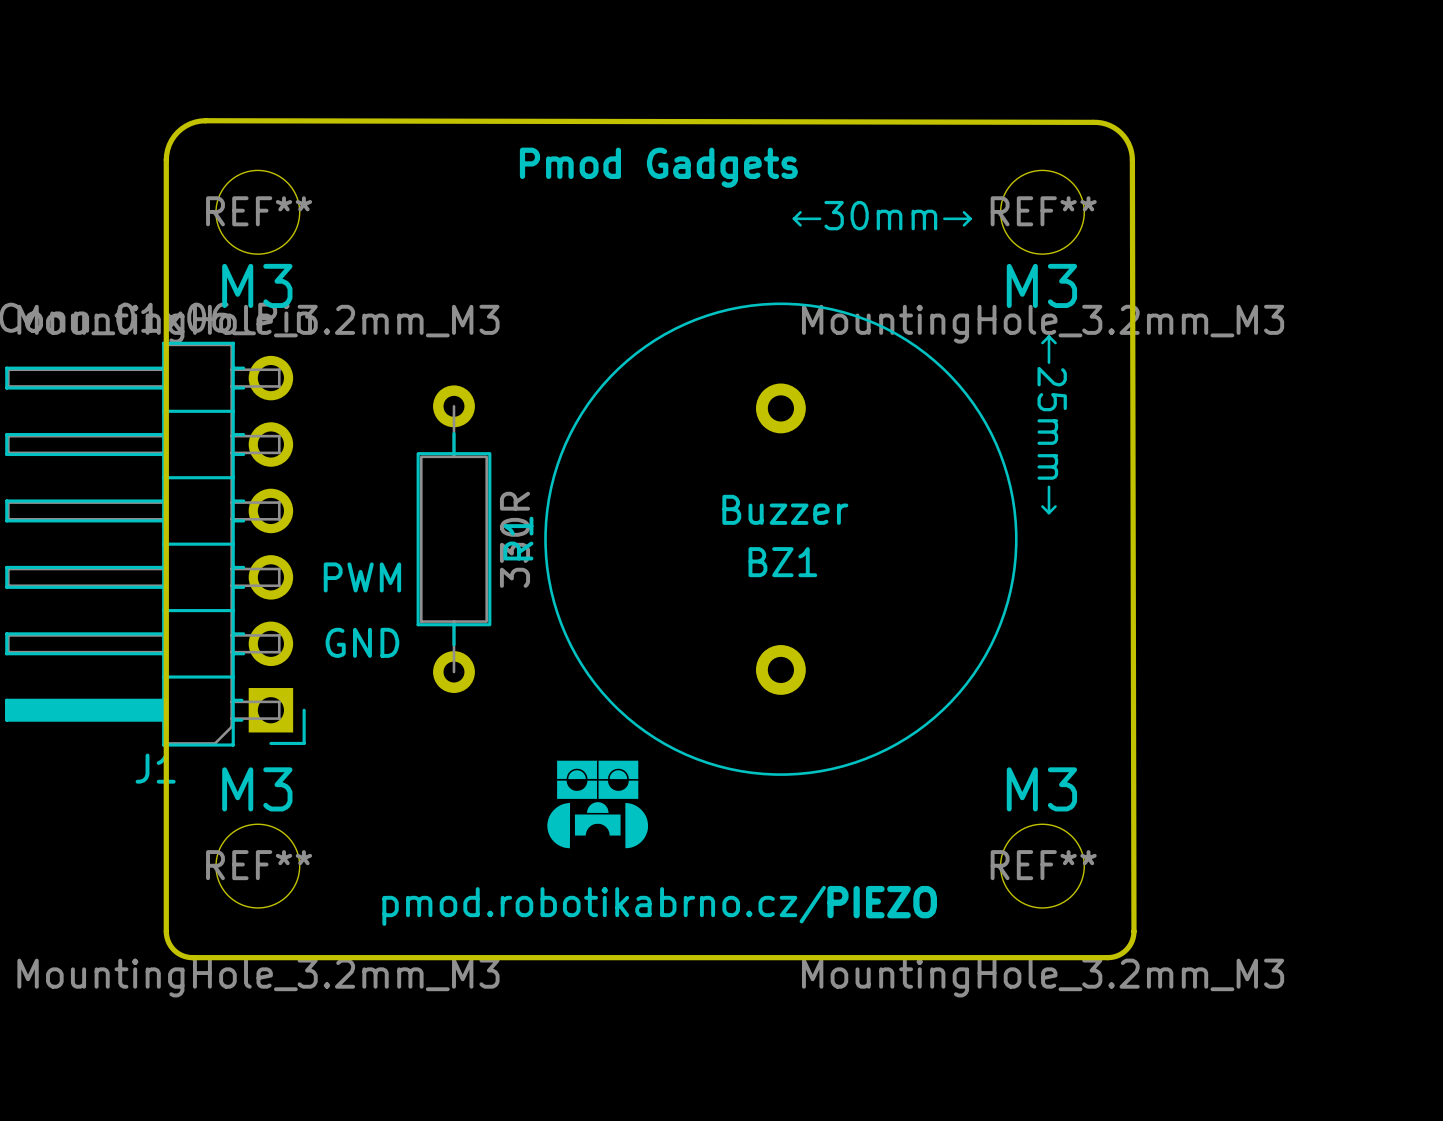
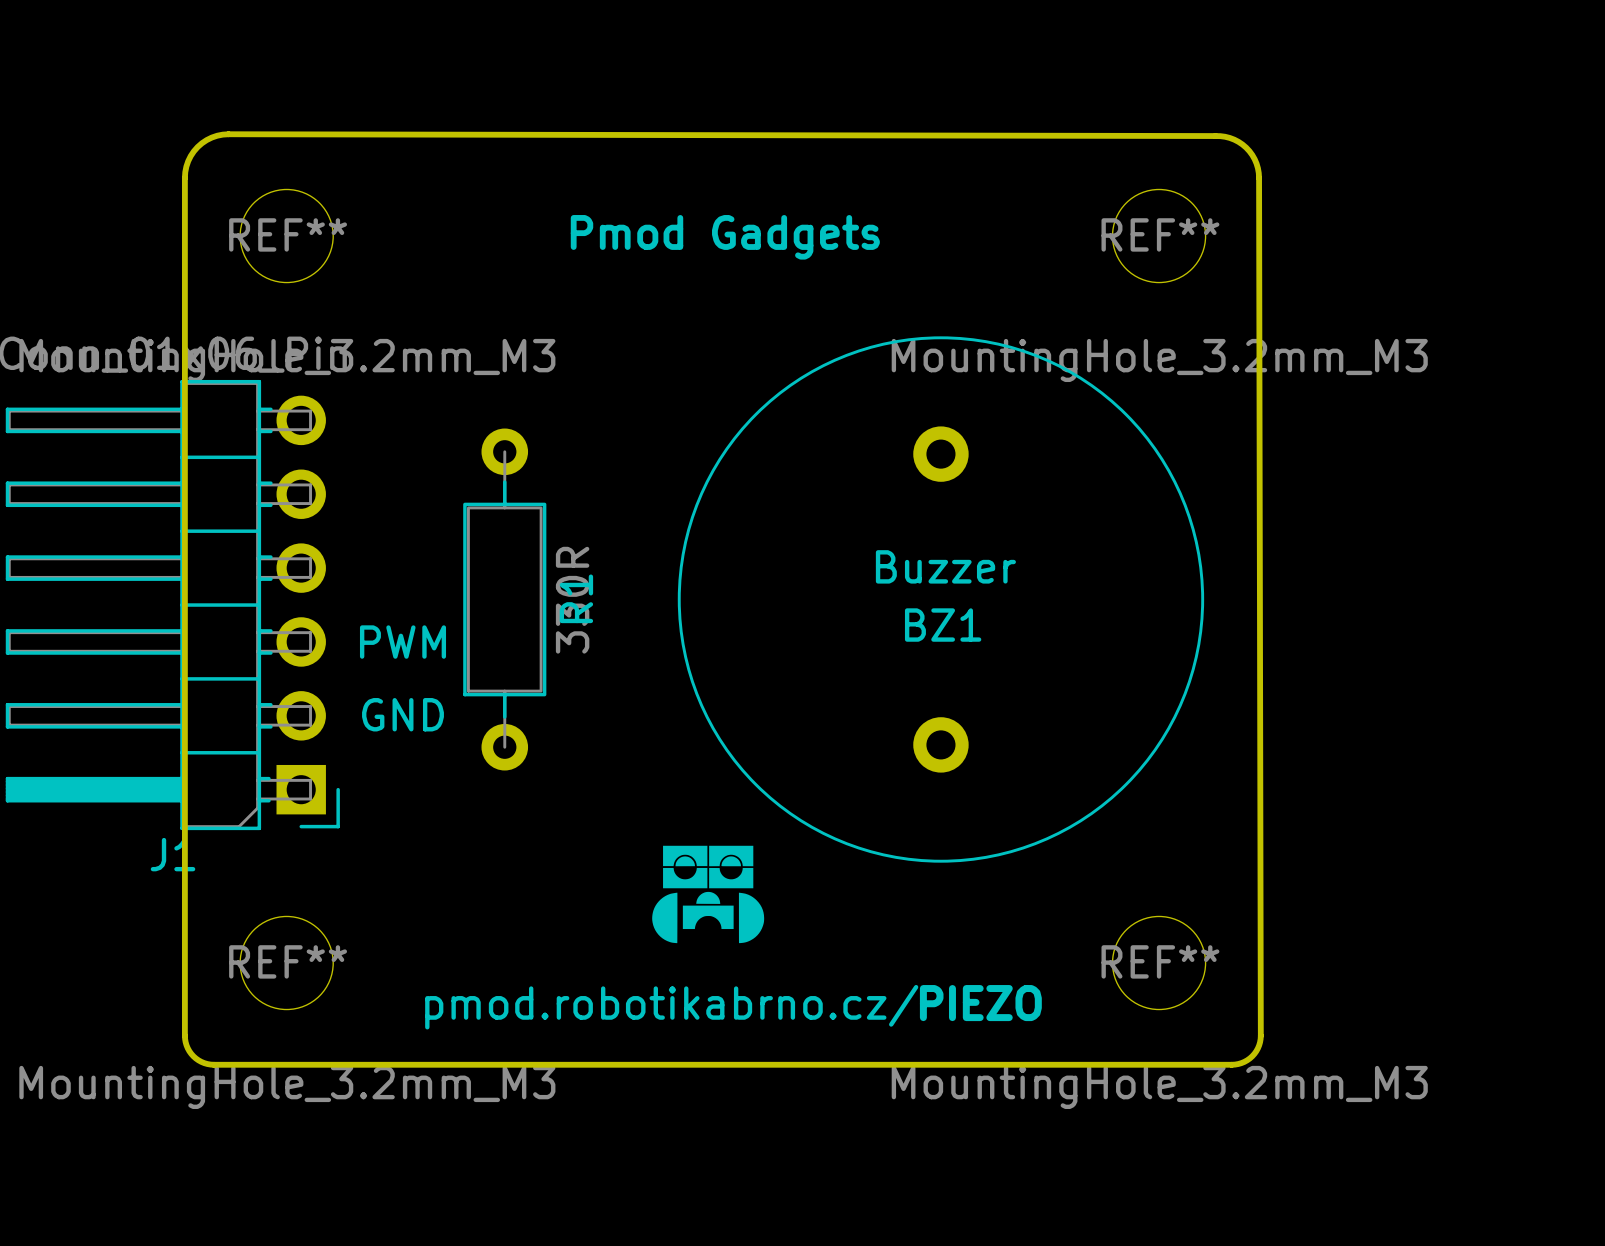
text position: Pmod Gadgets (658, 167) -> Pmod Gadgets (725, 237)
line: (800, 212) (793, 218) -> none
line: (963, 212) (970, 218) -> none
text: 30mm (880, 215) -> none
line: (793, 218) (820, 218) -> none
line: (793, 218) (800, 225) -> none
line: (944, 218) (970, 218) -> none
line: (970, 218) (963, 225) -> none
text: M3 (257, 285) -> none
text: M3 (1041, 285) -> none
line: (1048, 336) (1048, 362) -> none
line: (1048, 336) (1042, 343) -> none
line: (1048, 336) (1055, 343) -> none
text: 25mm (1052, 423) -> none
line: (1048, 486) (1048, 513) -> none
line: (1042, 506) (1048, 513) -> none
line: (1055, 506) (1048, 513) -> none
part position: (780, 539) -> (940, 599)
text: M3 (257, 789) -> none
text: M3 (1041, 789) -> none
drawing position: (597, 804) -> (708, 894)

